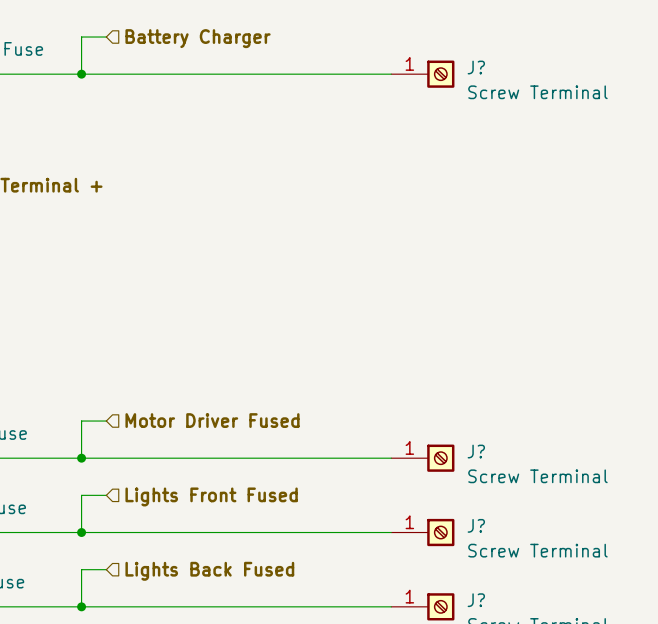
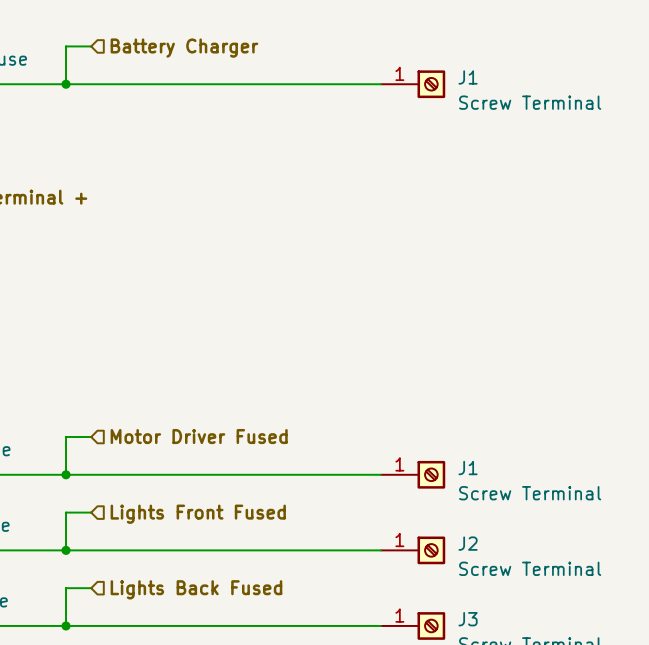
J? name: J? (476, 67) -> J1 (468, 77)
J? name: J? (476, 451) -> J1 (468, 468)
J? name: J? (476, 525) -> J2 (468, 543)
J? name: J? (476, 600) -> J3 (468, 619)

